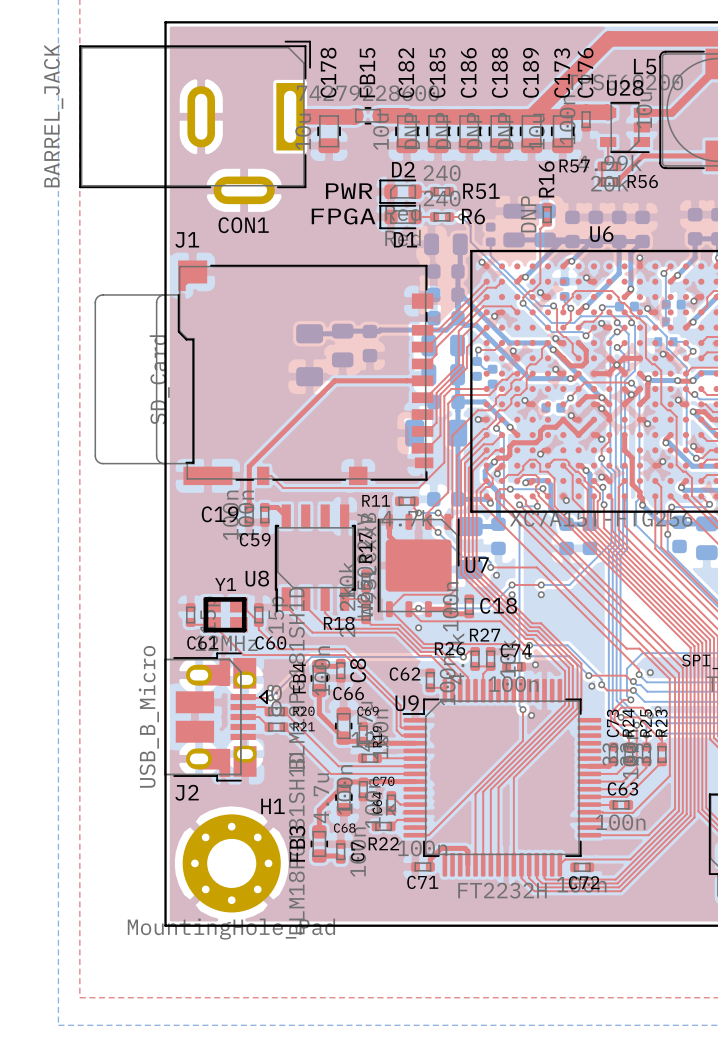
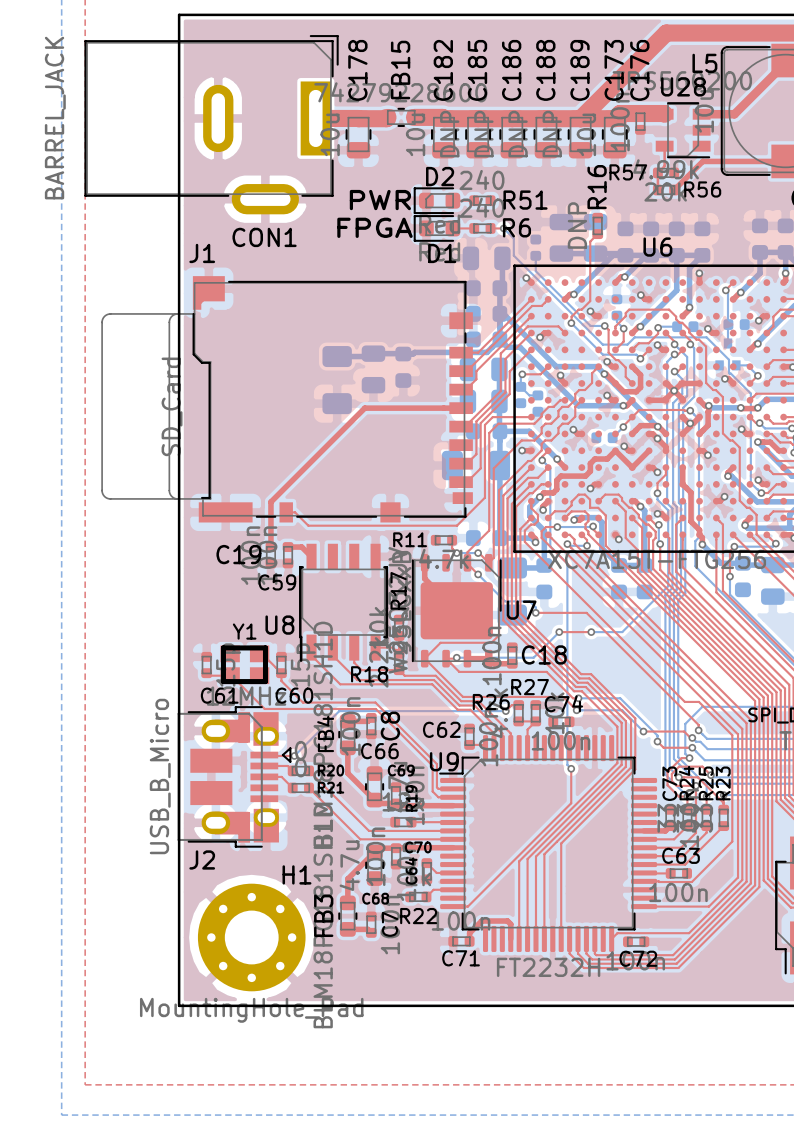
via: (496, 575) -> none
via: (512, 594) -> none
via: (541, 594) -> none
via: (418, 627) -> none
via: (535, 664) -> none
via: (650, 672) -> none
via: (591, 686) -> none
via: (270, 688) -> none
via: (658, 709) -> none
via: (531, 715) -> none

